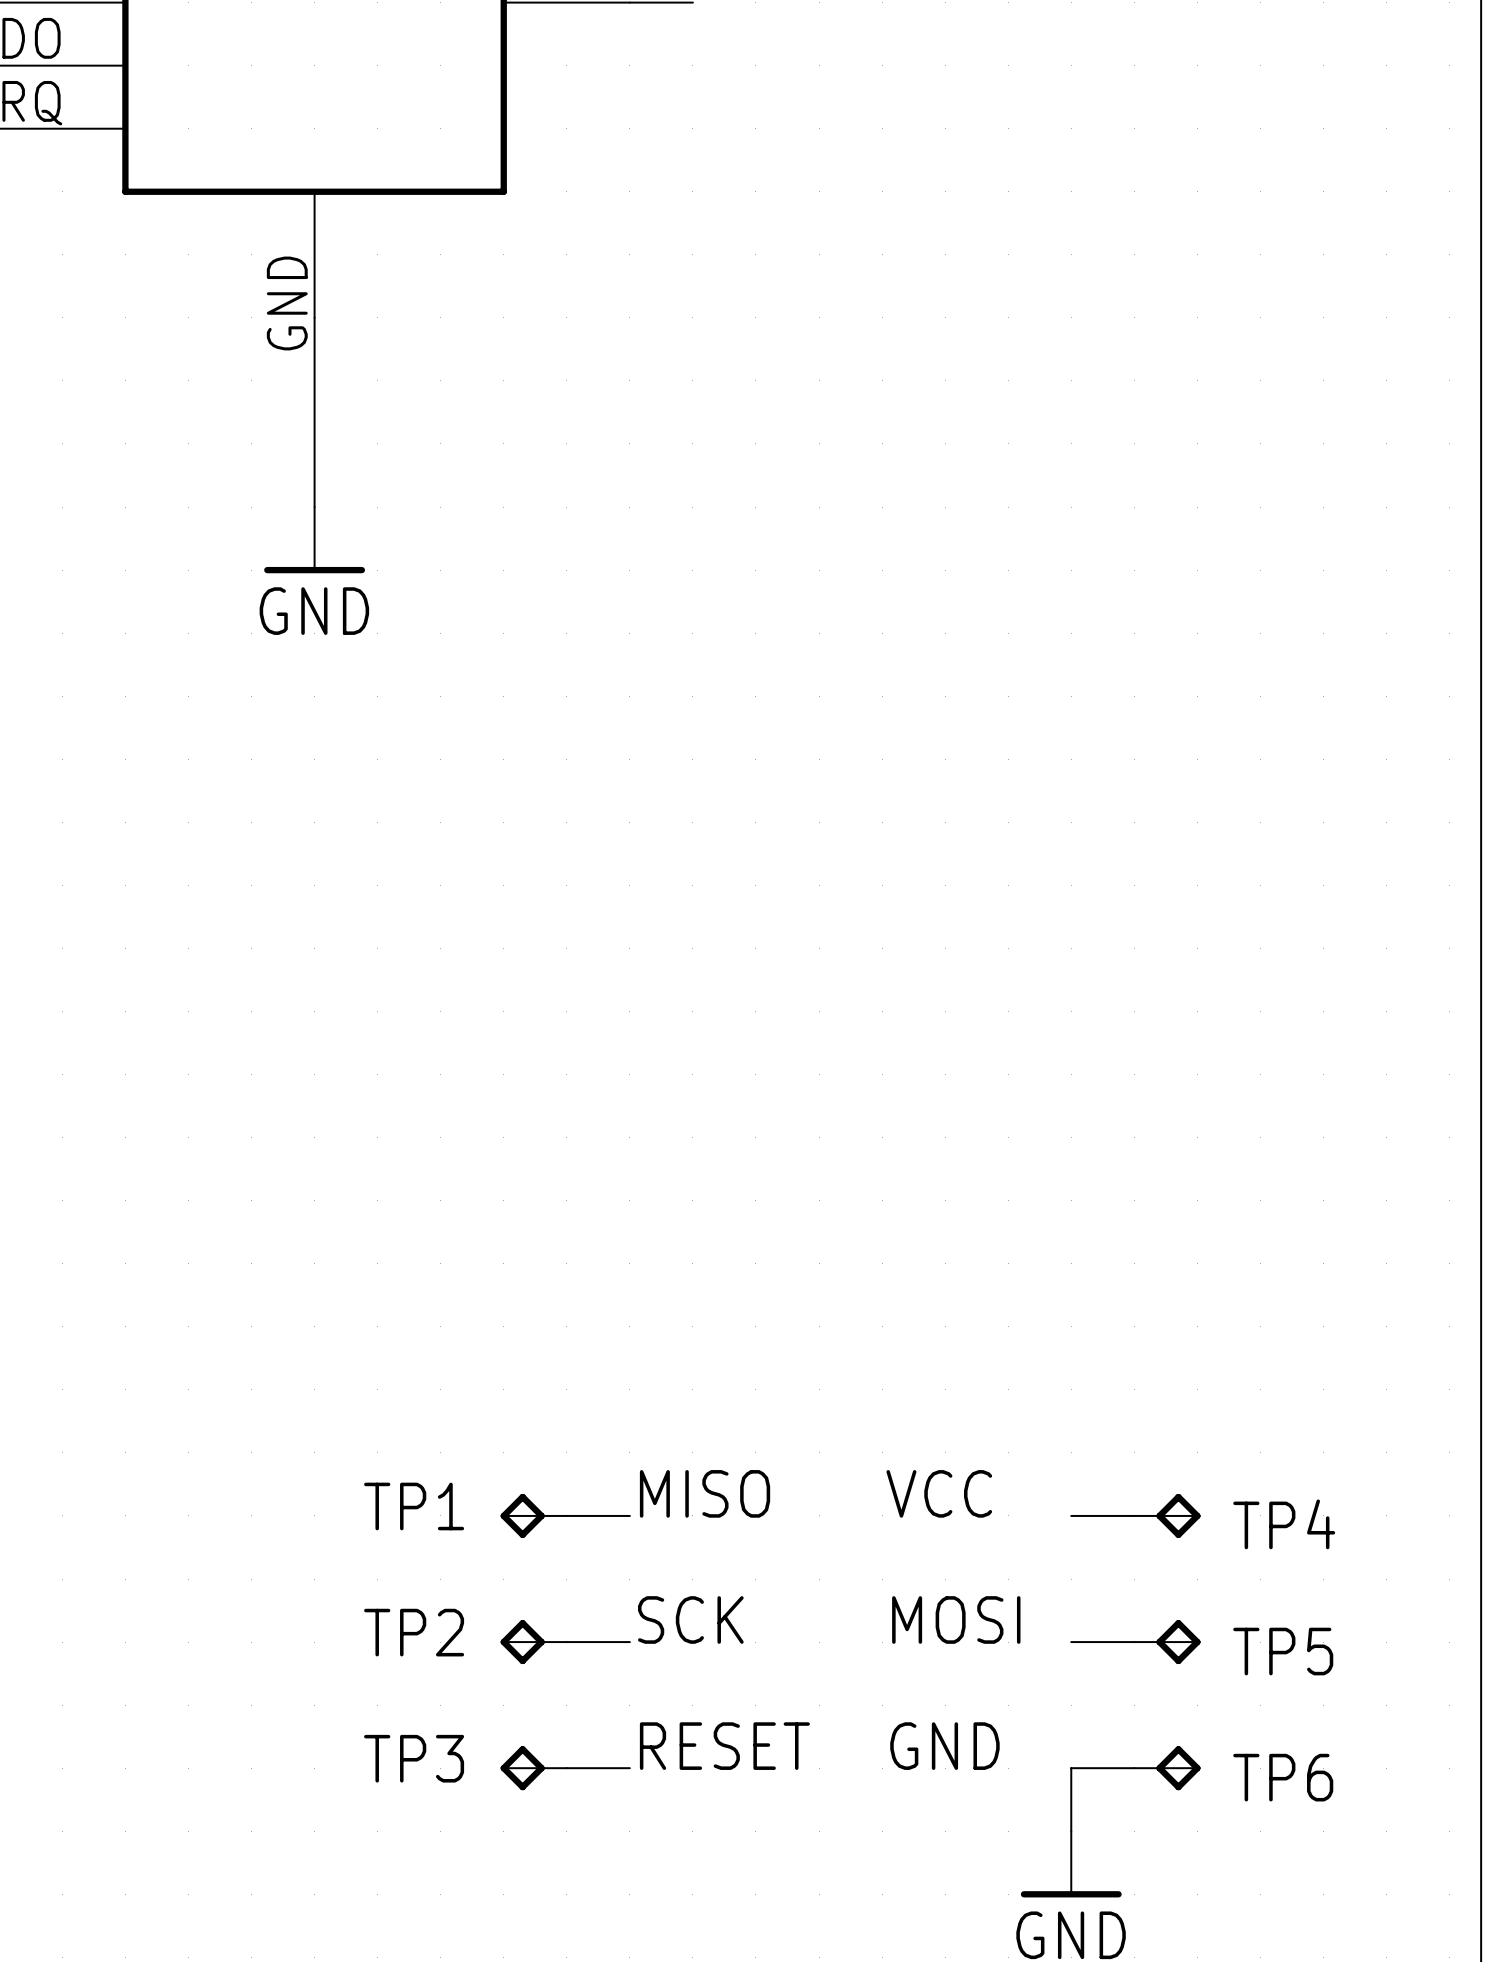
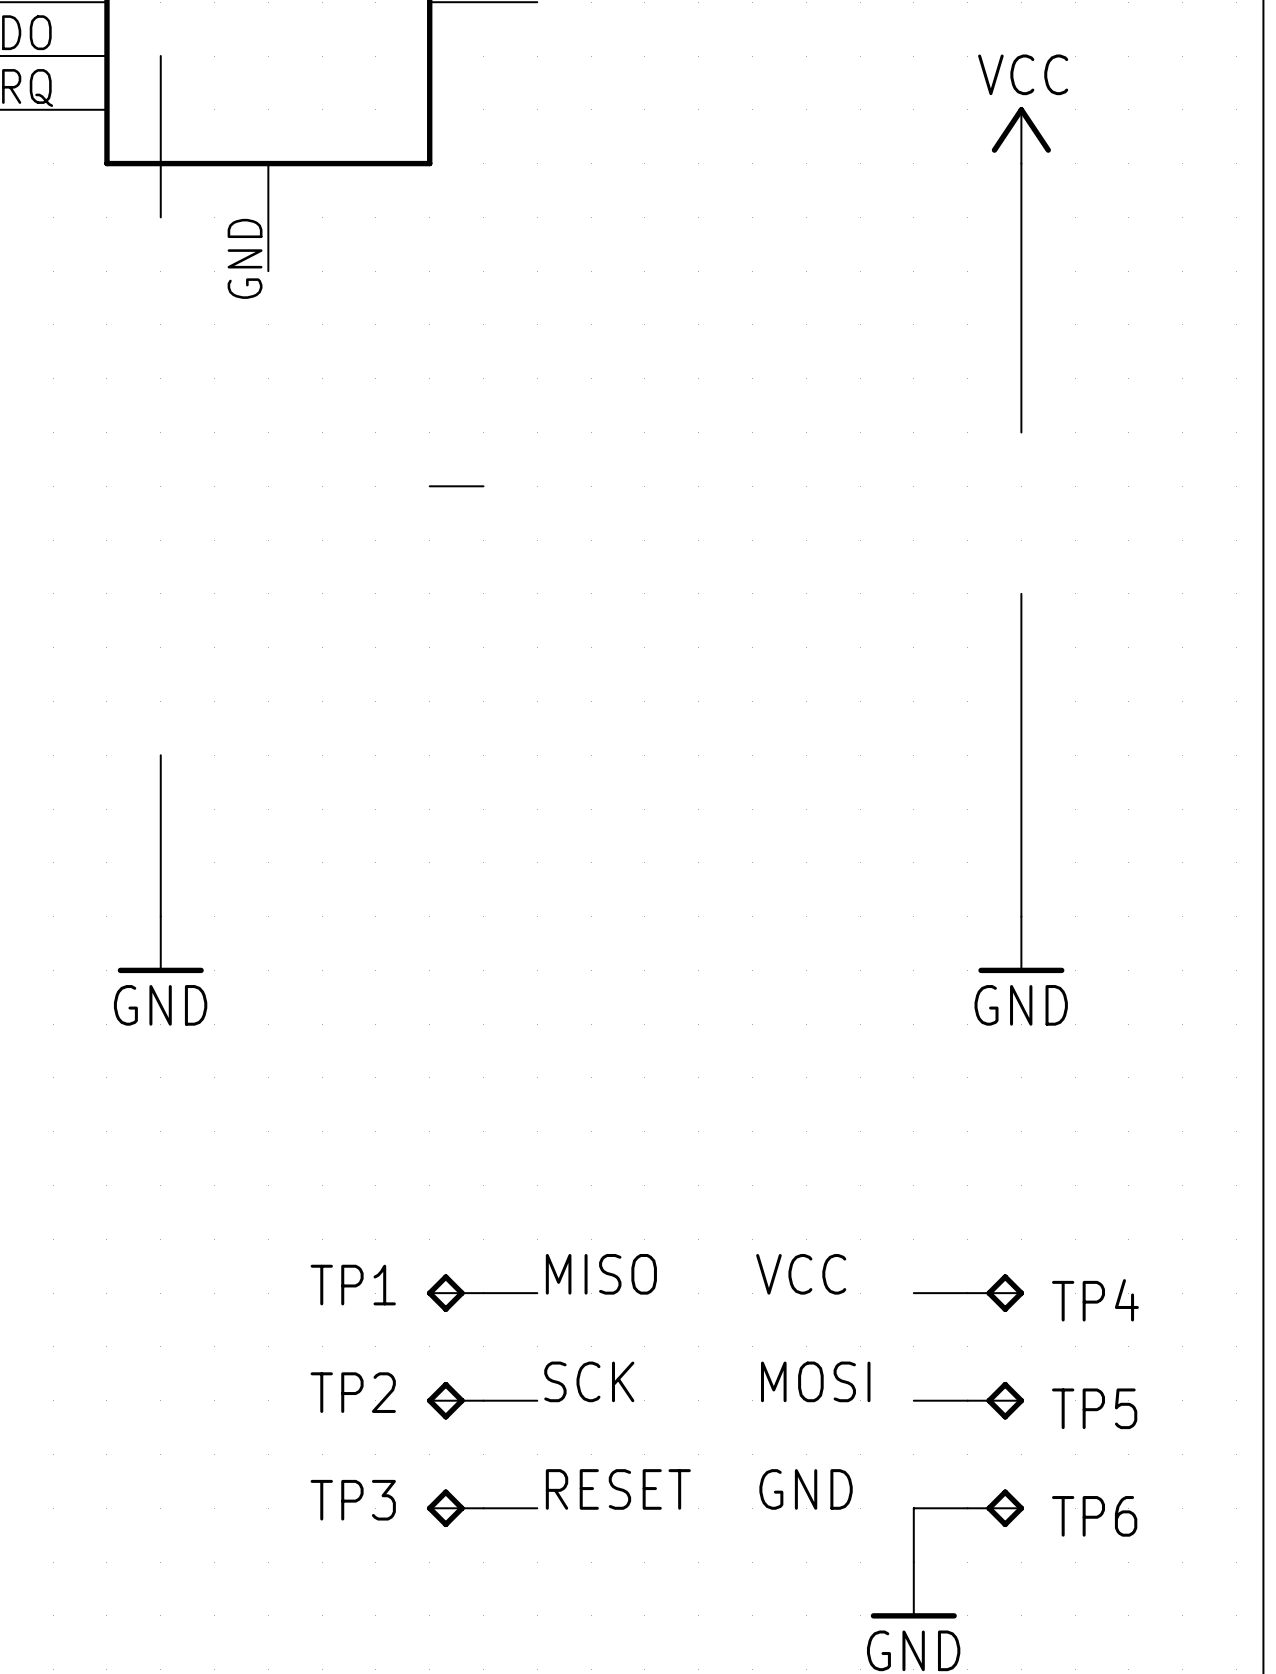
wire: (629, 2) (692, 2) -> (429, 486) (483, 486)
wire: none -> (160, 56) (160, 217)
power symbol: none -> VCC (1021, 135)
wire: none -> (1021, 163) (1021, 432)
wire: (314, 317) (314, 507) -> (160, 755) (160, 916)
power symbol: GND (314, 540) -> none
wire: none -> (1021, 593) (1021, 916)
power symbol: none -> GND (160, 944)
power symbol: none -> GND (1021, 944)

